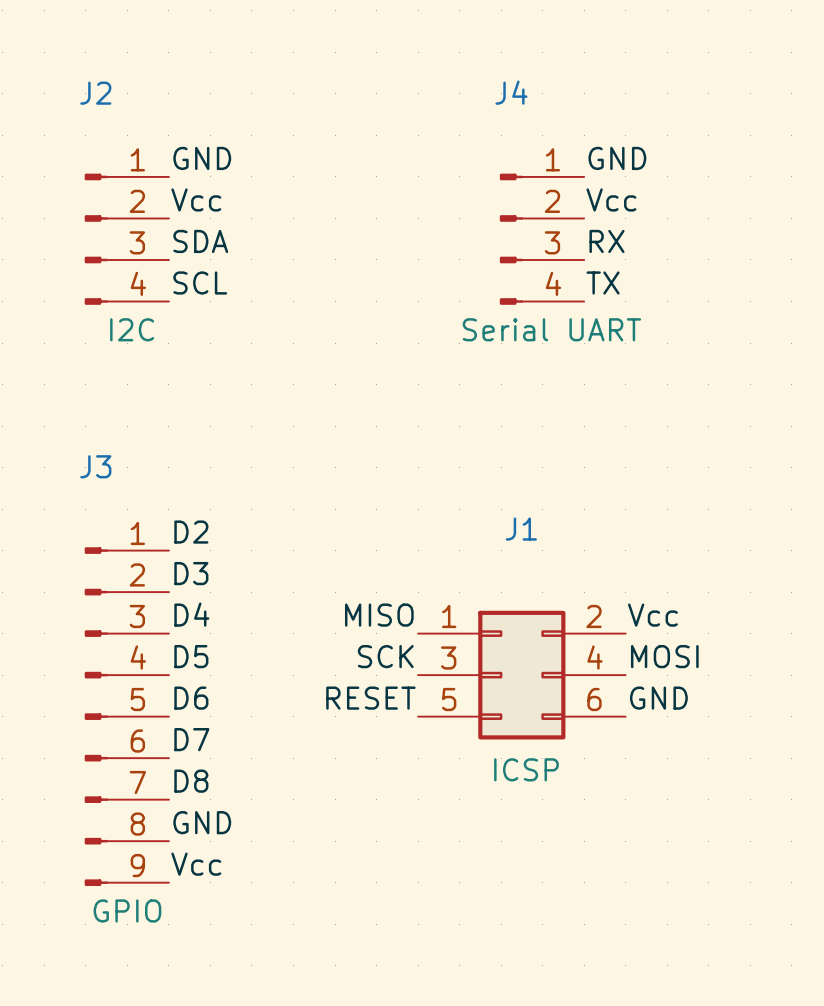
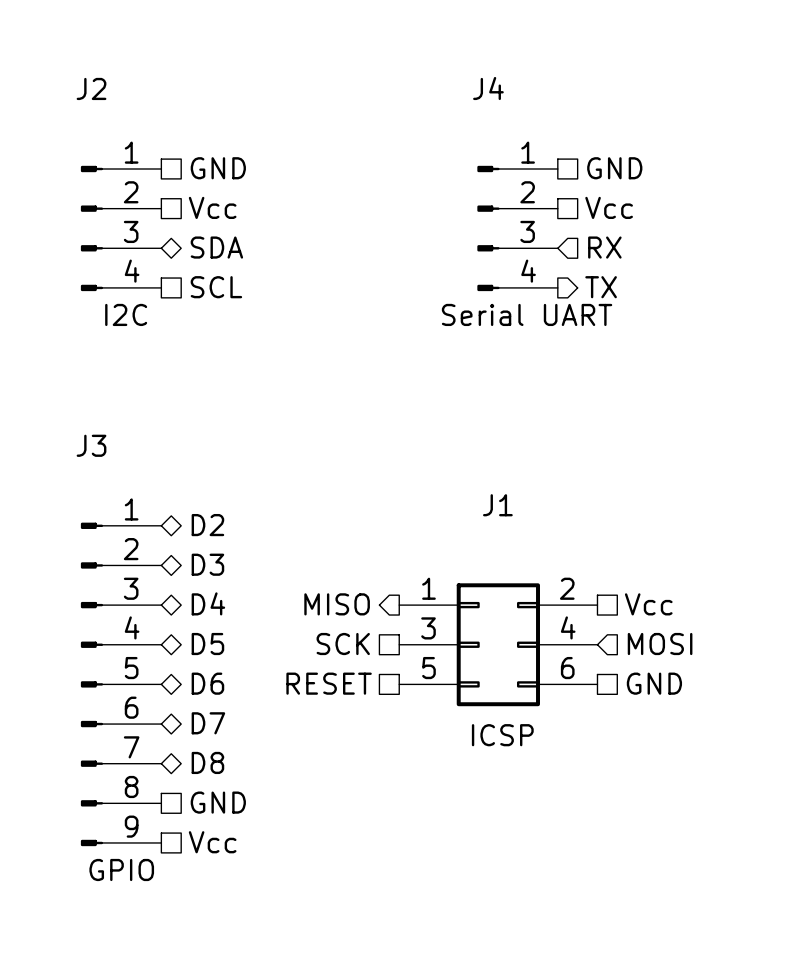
label: GND (202, 158) -> none
label: GND (617, 158) -> none
hierarchical label: none -> GND (218, 168)
hierarchical label: none -> GND (614, 168)
label: Vcc (196, 199) -> none
label: Vcc (611, 199) -> none
hierarchical label: none -> Vcc (212, 207)
hierarchical label: none -> Vcc (609, 207)
label: SDA (200, 241) -> none
label: RX (606, 241) -> none
hierarchical label: none -> SDA (216, 247)
hierarchical label: none -> RX (604, 247)
label: SCL (200, 282) -> none
label: TX (603, 282) -> none
hierarchical label: none -> SCL (216, 287)
hierarchical label: none -> TX (601, 287)
label: D2 (191, 532) -> none
hierarchical label: none -> D2 (207, 525)
label: D3 (191, 573) -> none
hierarchical label: none -> D3 (207, 564)
label: D4 (191, 614) -> none
label: MISO (379, 615) -> none
label: Vcc (652, 615) -> none
hierarchical label: none -> D4 (208, 603)
hierarchical label: none -> MISO (337, 604)
hierarchical label: none -> Vcc (648, 604)
label: D5 (191, 656) -> none
label: SCK (385, 656) -> none
label: MOSI (664, 656) -> none
hierarchical label: none -> D5 (207, 644)
hierarchical label: none -> SCK (343, 644)
hierarchical label: none -> MOSI (660, 644)
label: D6 (191, 698) -> none
label: RESET (370, 698) -> none
label: GND (658, 698) -> none
hierarchical label: none -> D6 (207, 683)
hierarchical label: none -> RESET (329, 683)
hierarchical label: none -> GND (654, 683)
label: D7 (191, 739) -> none
hierarchical label: none -> D7 (208, 723)
label: D8 (191, 781) -> none
hierarchical label: none -> D8 (207, 762)
label: GND (202, 822) -> none
hierarchical label: none -> GND (218, 802)
label: Vcc (196, 864) -> none
hierarchical label: none -> Vcc (212, 842)

